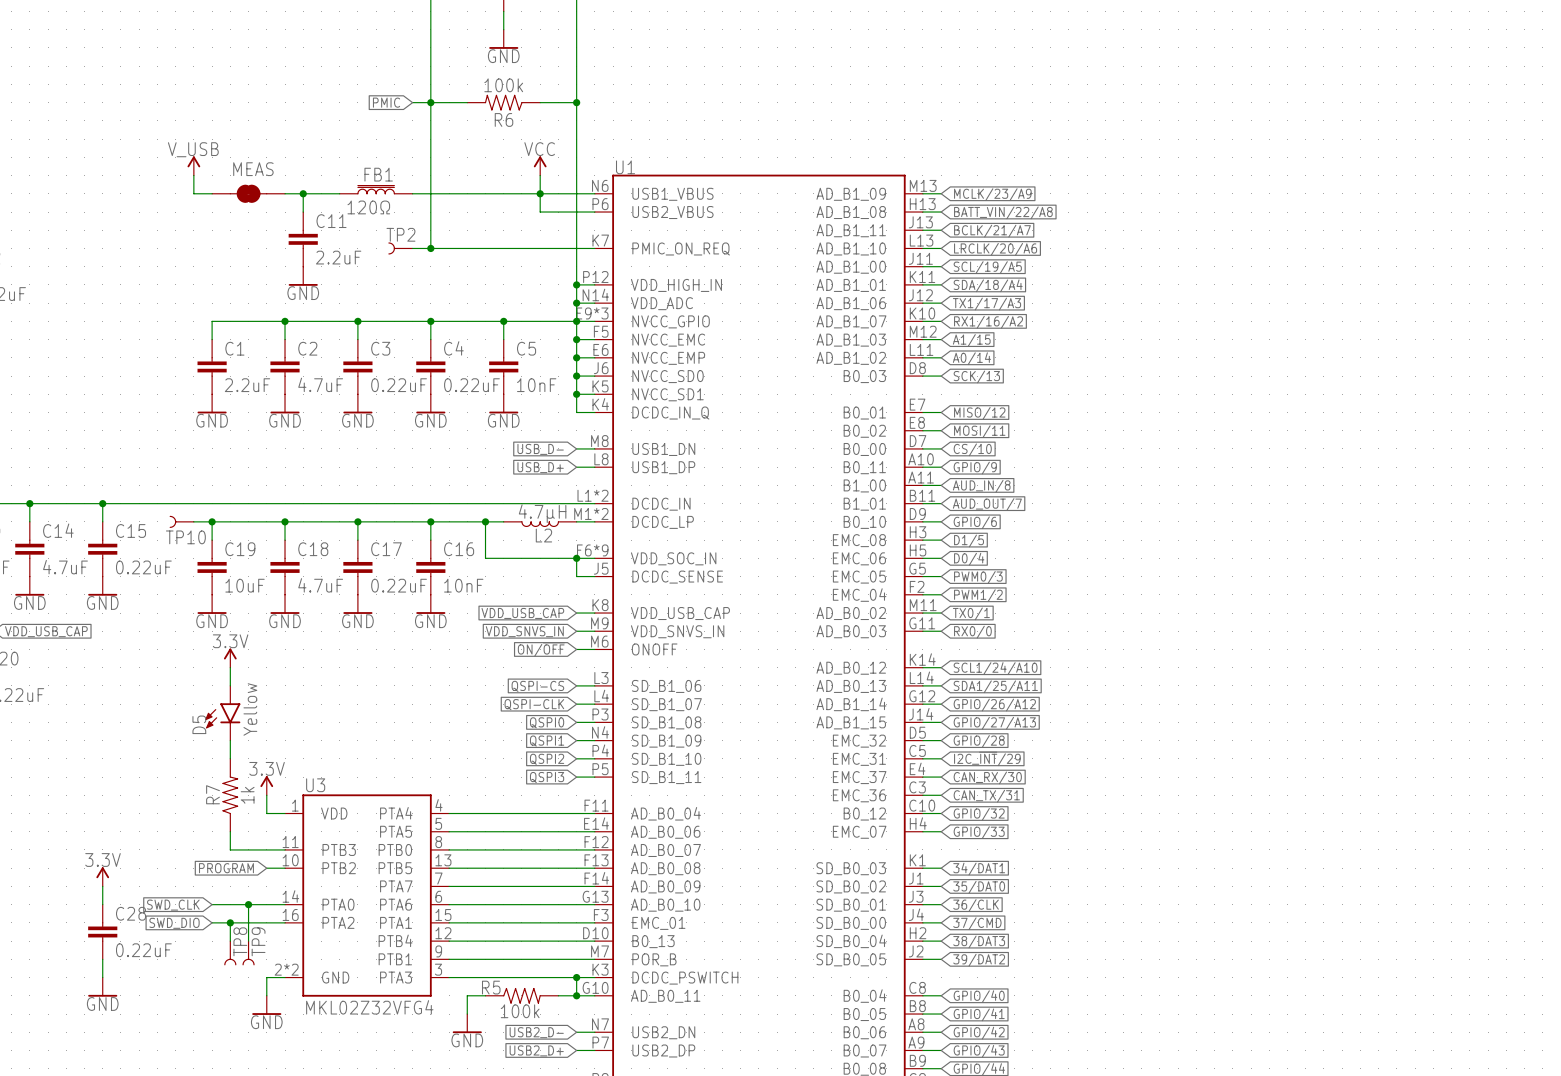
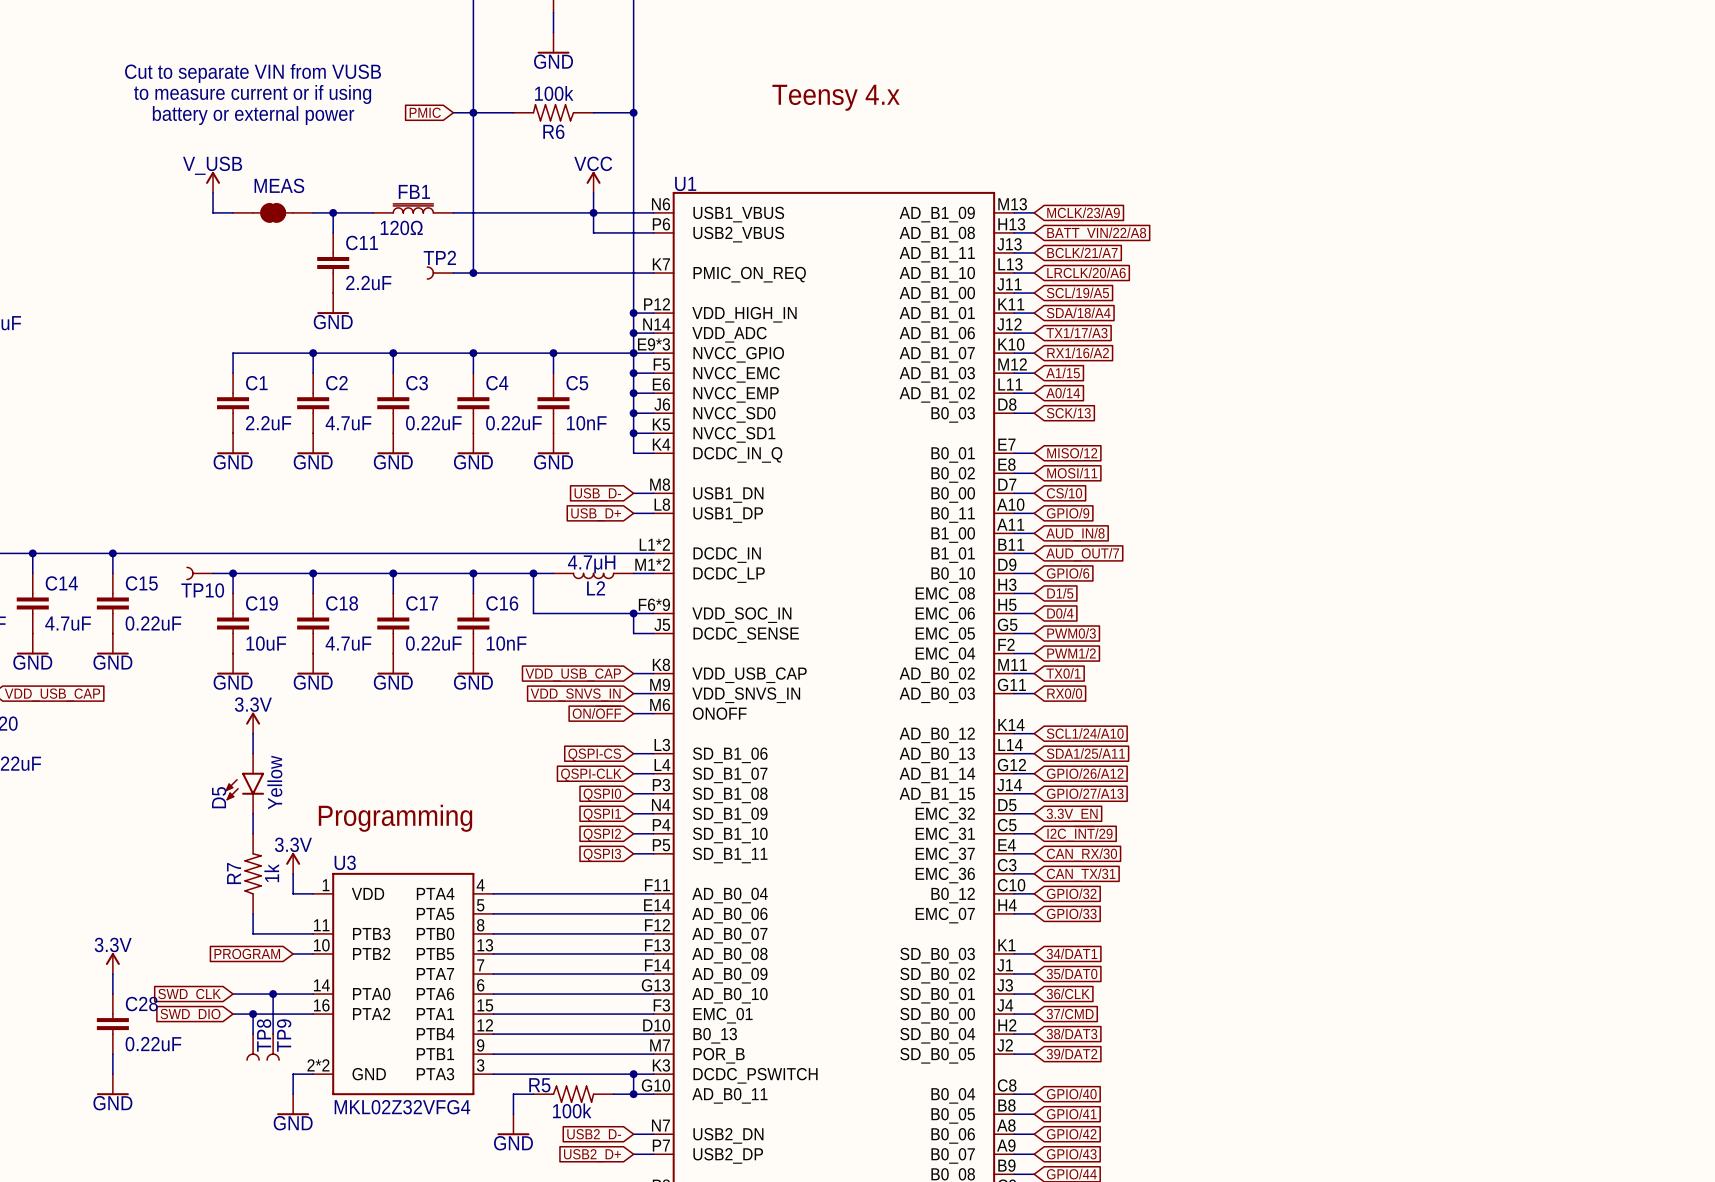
text: none -> Cut to separate VIN from VUSB (253, 73)
text: none -> to measure current or if using (252, 94)
text: none -> Teensy 4.x (836, 97)
text: none -> battery or external power (253, 115)
global label: GPIO/28 (979, 741) -> 3.3V_EN (1072, 815)
text: none -> Programming (395, 818)

